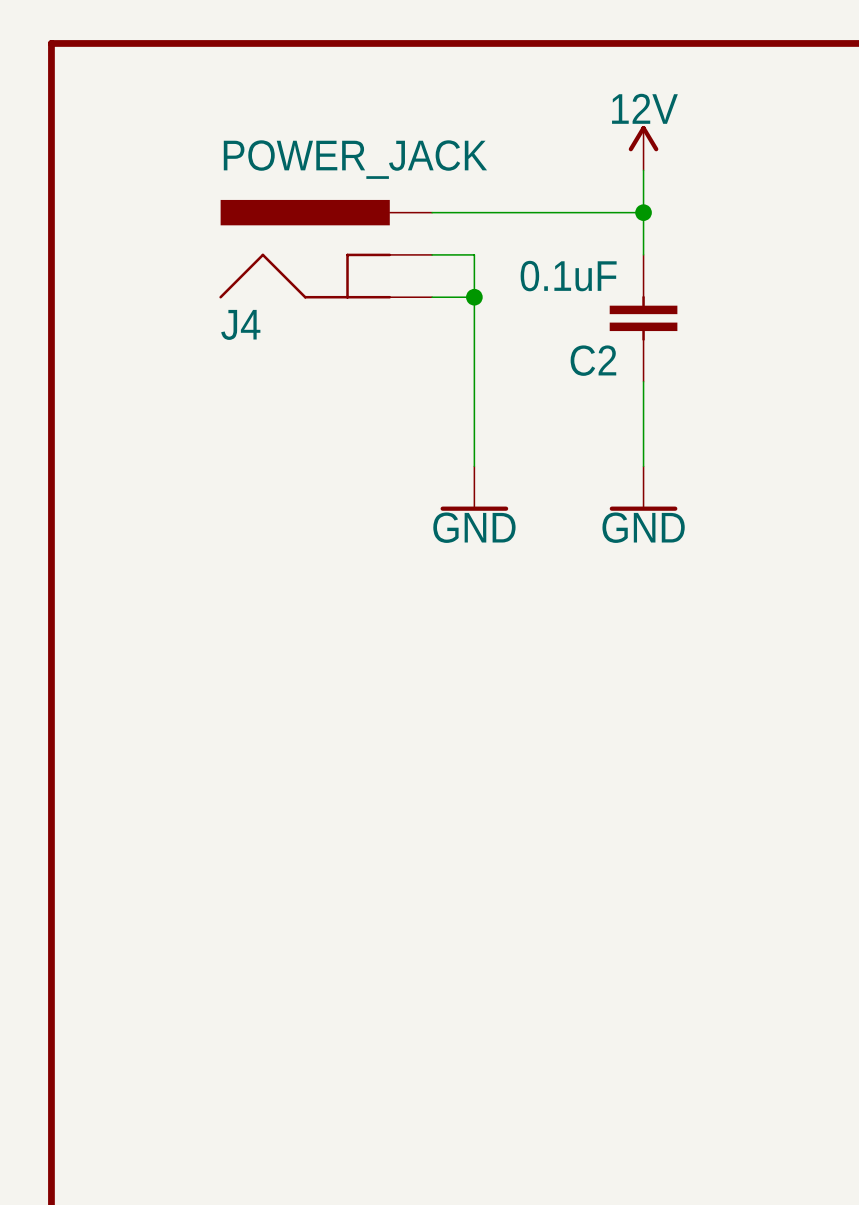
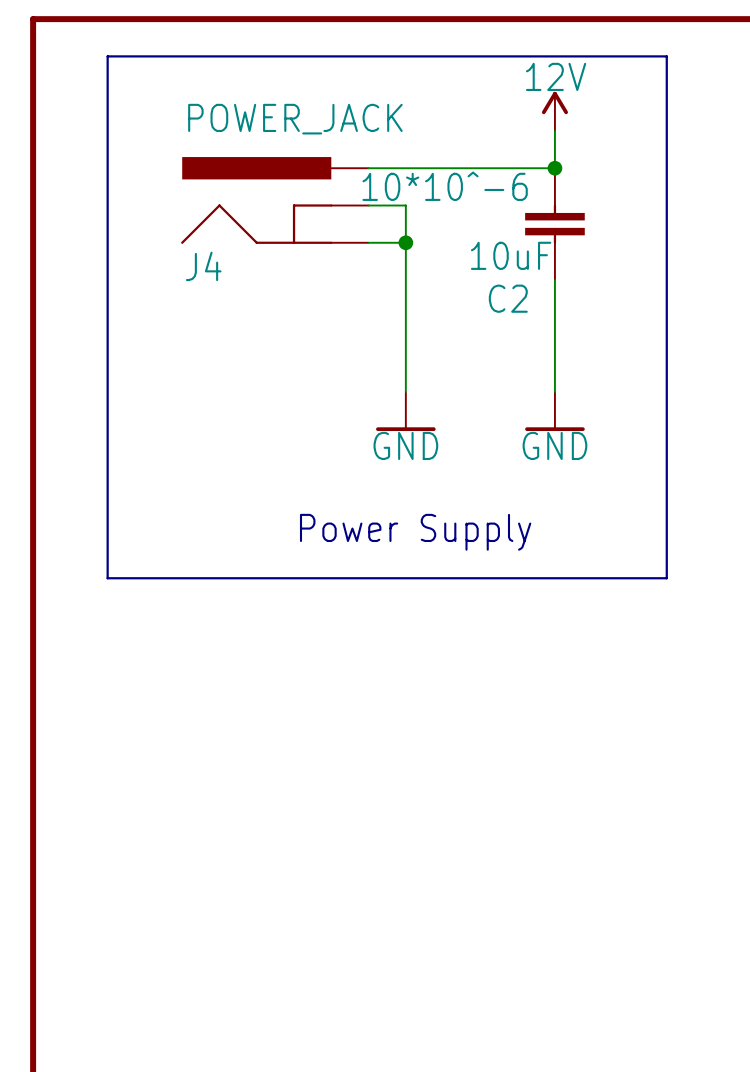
line: none -> (107, 56) (107, 578) (666, 578) (666, 56) (107, 56)
C2 value: 0.1uF (568, 276) -> 10*10^-6 (445, 186)
C2 text: none -> 10uF (511, 255)
C2 position: (643, 318) -> (554, 224)
text: none -> Power Supply (415, 532)

